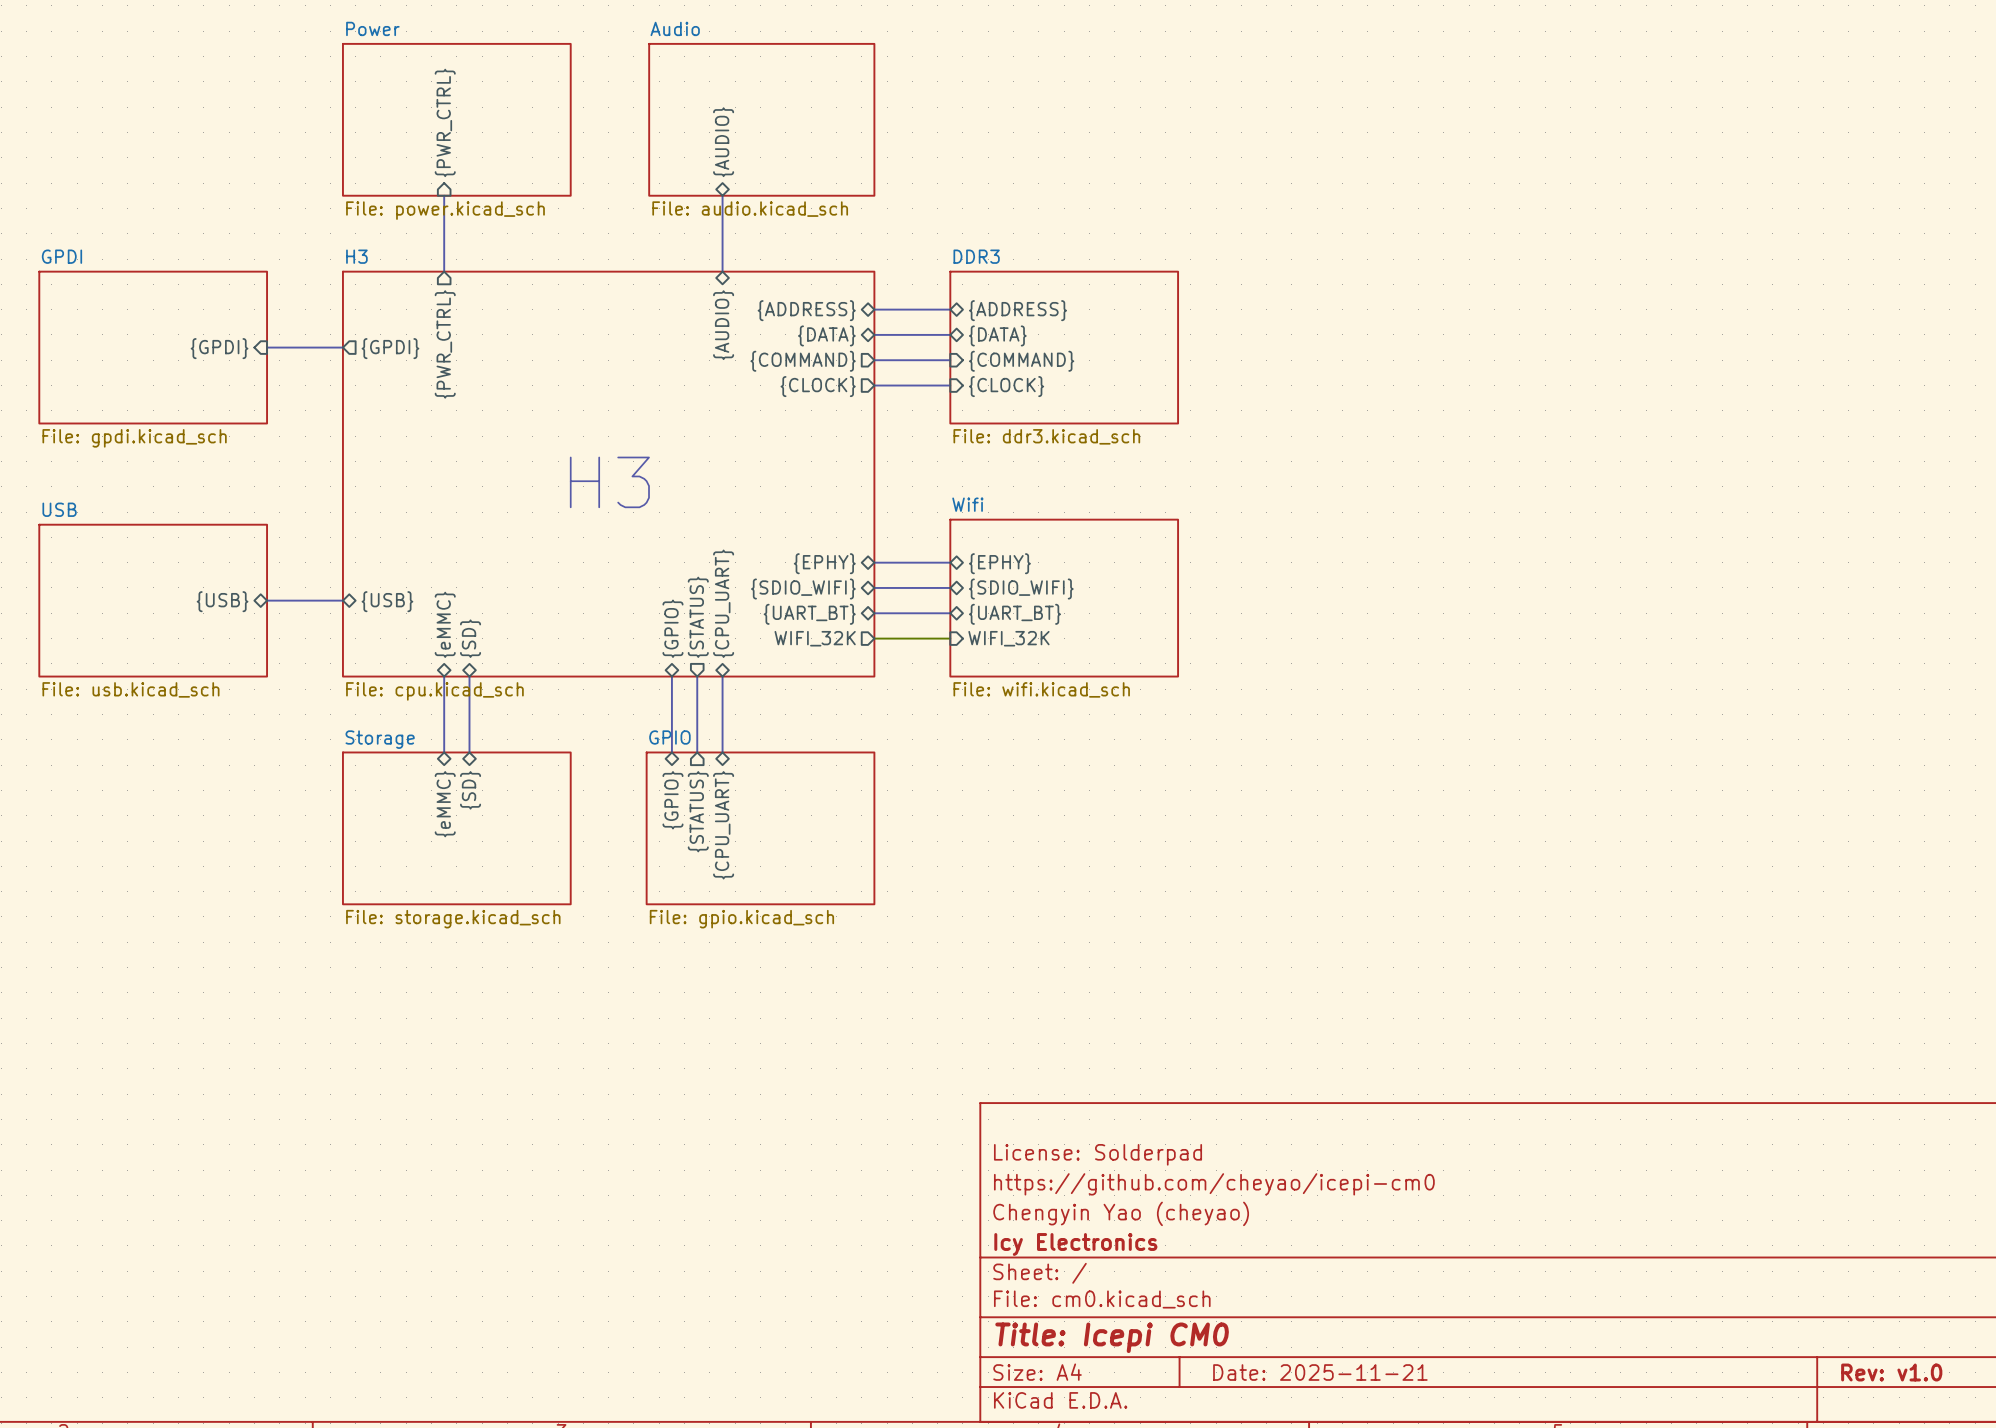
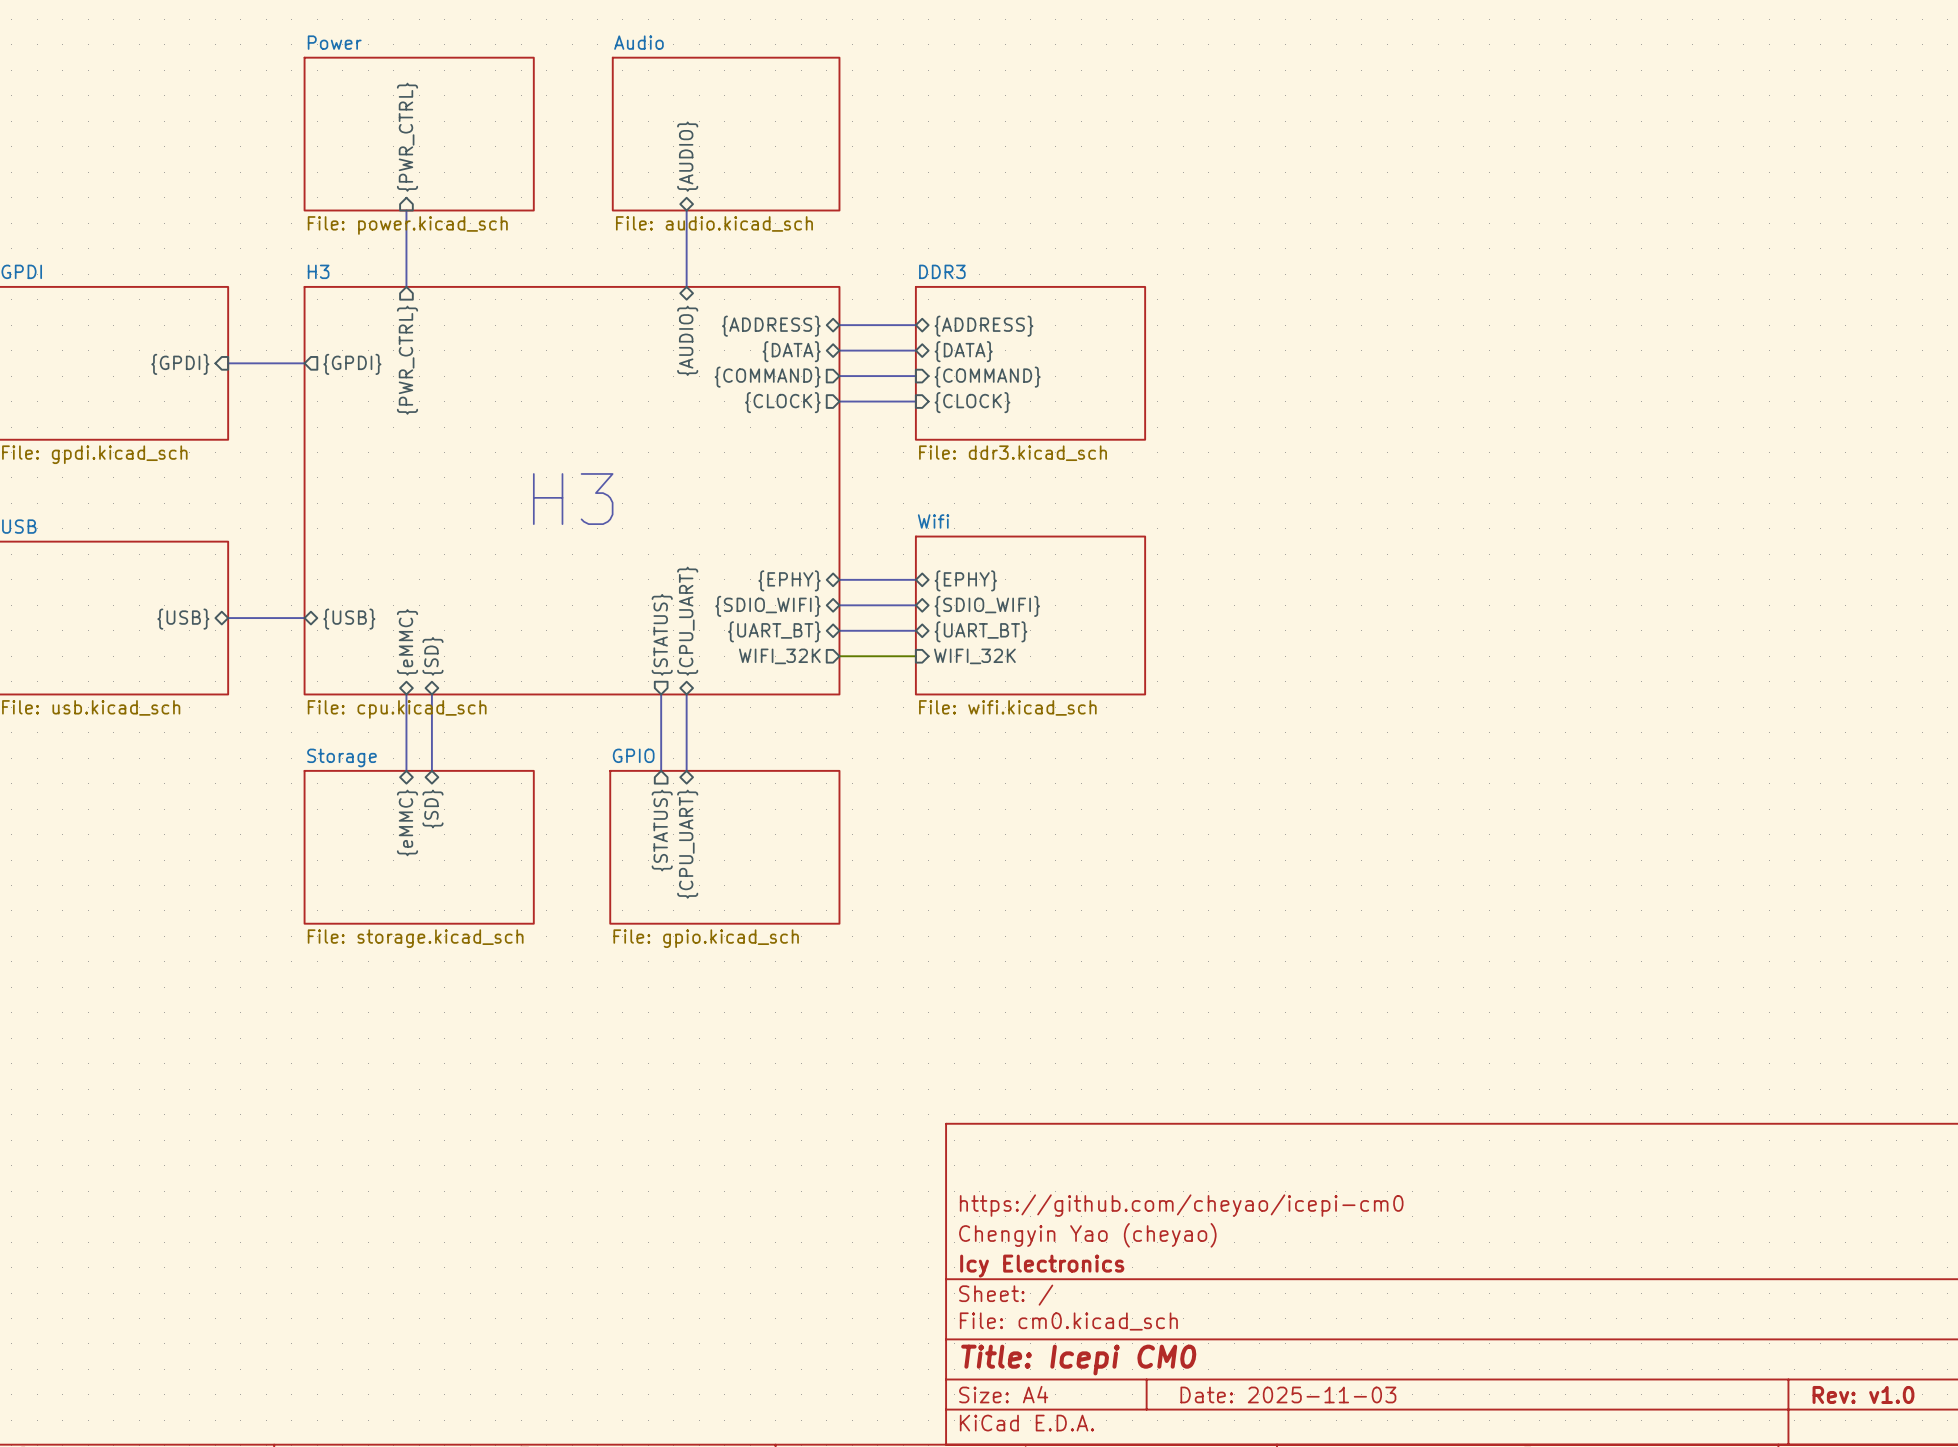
sheet pin: {GPIO} (672, 628) -> none
bus: (671, 676) (671, 752) -> none
sheet pin: {GPIO} (672, 800) -> none
title block: License: Solderpad (1098, 1154) -> none
title block: Date: 2025-11-21 (1320, 1372) -> Date: 2025-11-03 (1288, 1394)

